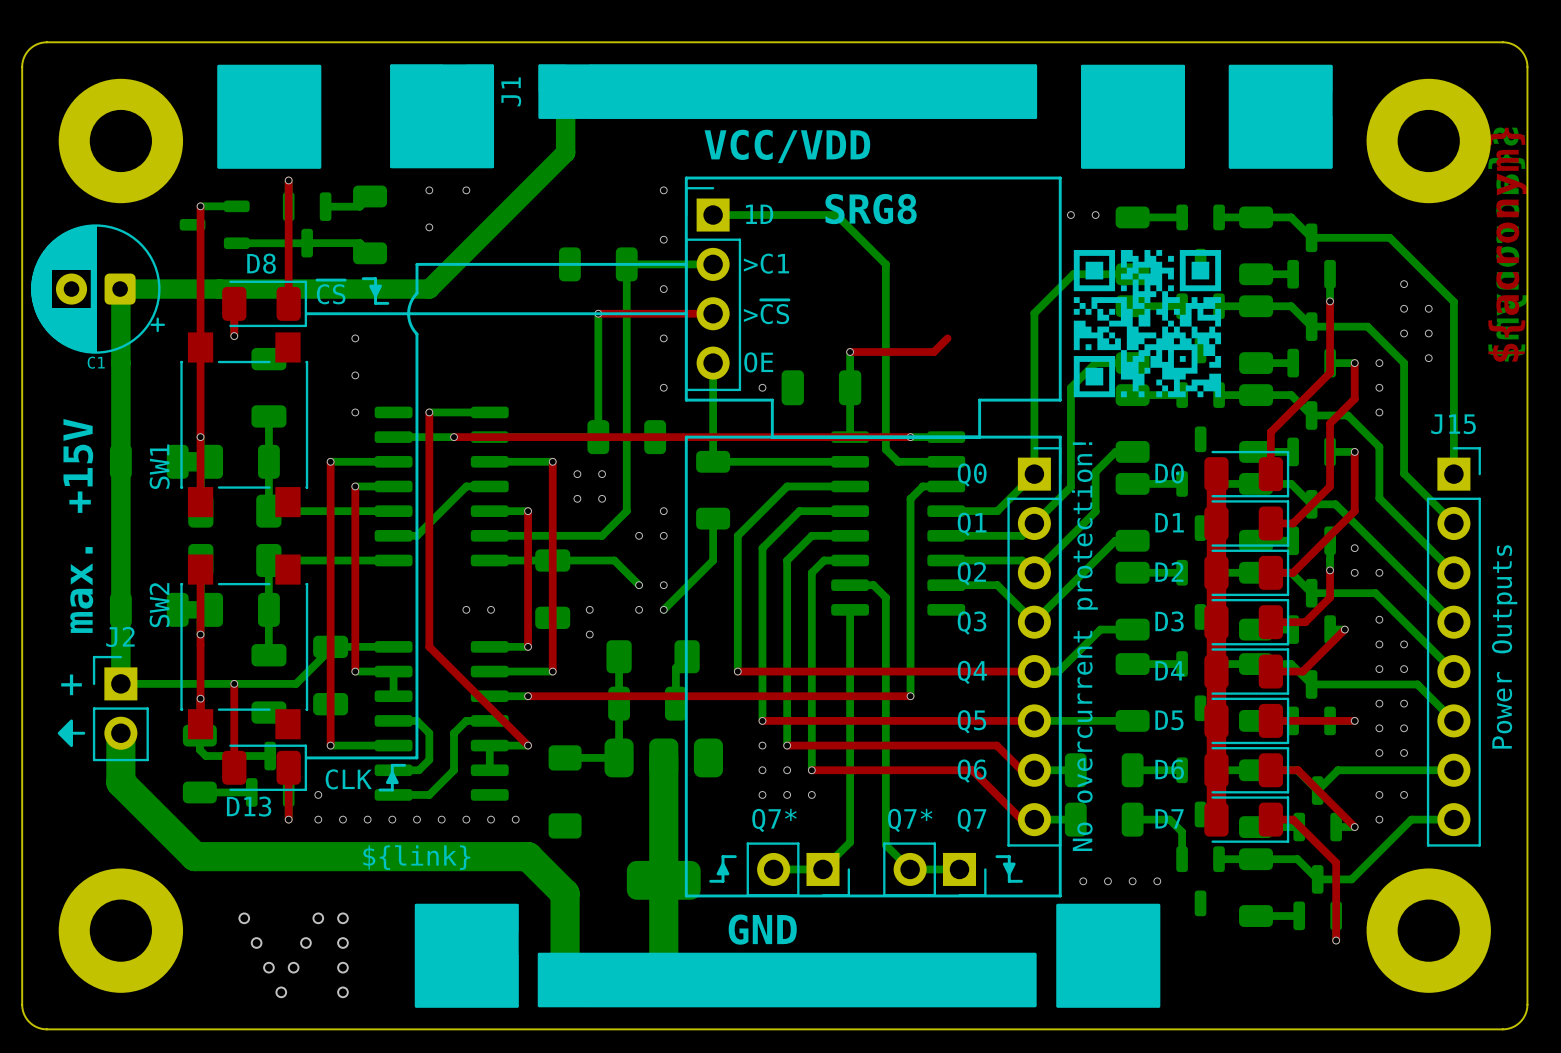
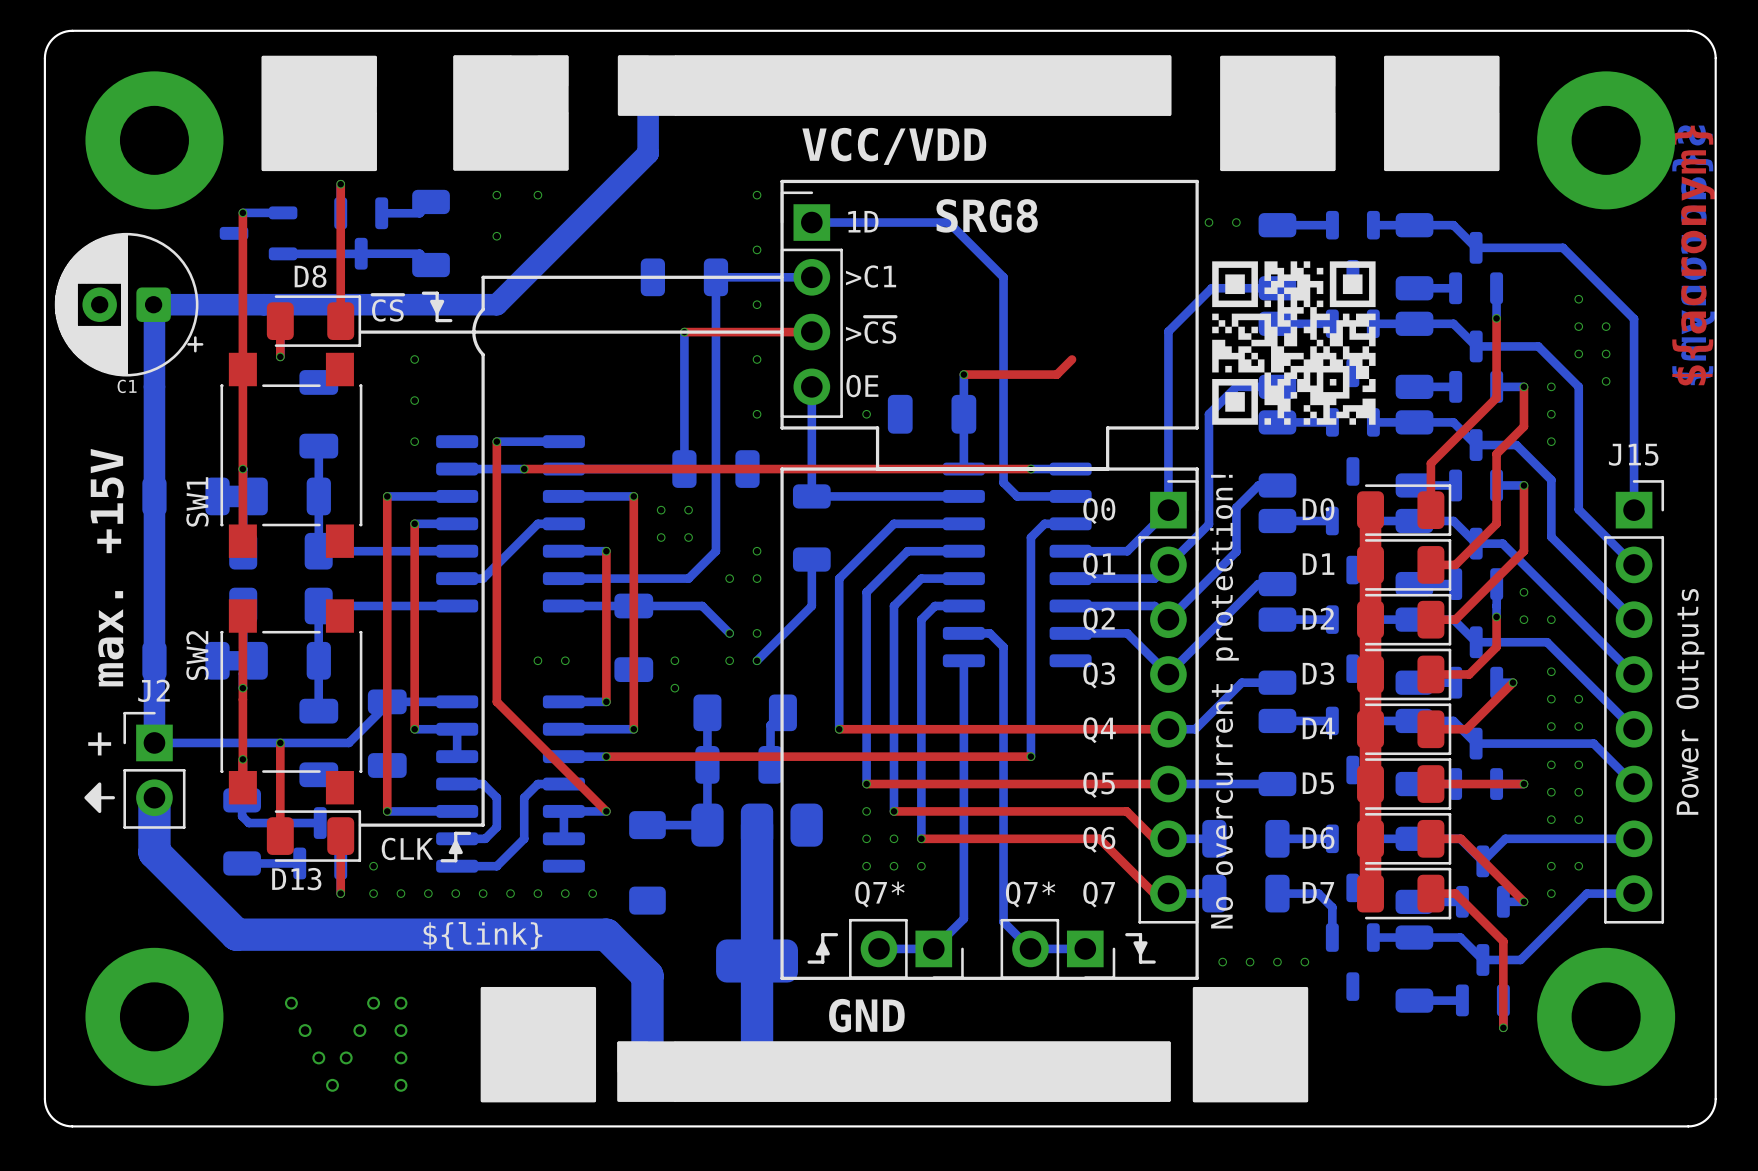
J1 name: J1 (511, 91) -> none

